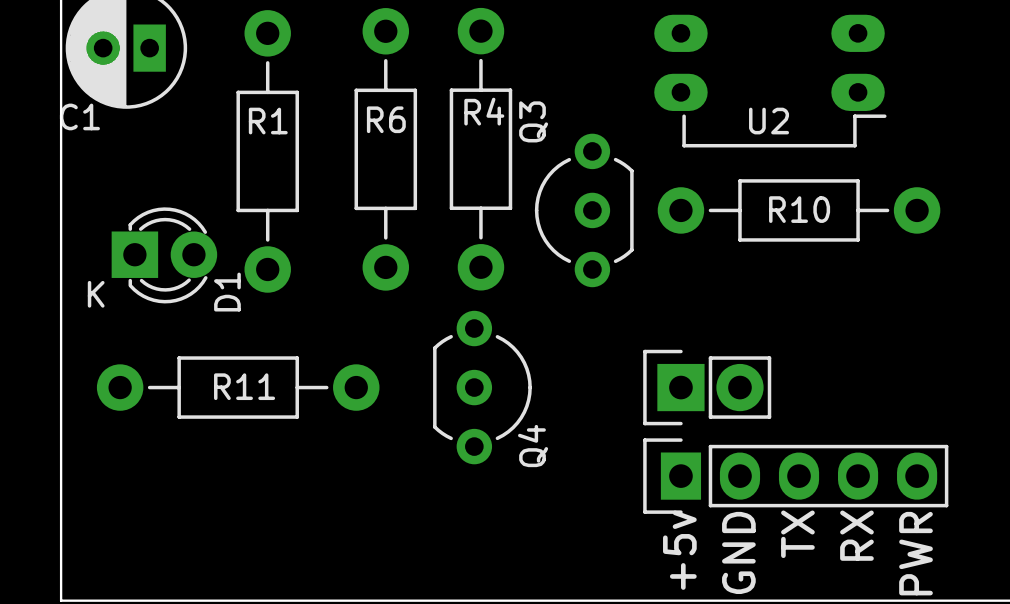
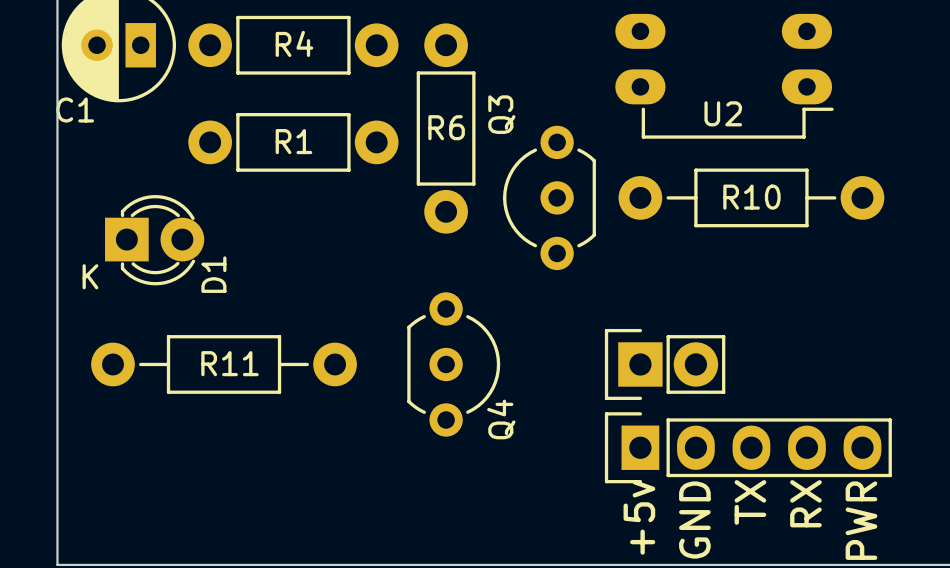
R4 footprint: [449, 7, 513, 291] -> [188, 15, 399, 75]
R6 footprint: [354, 8, 418, 291] -> [416, 23, 476, 234]
R1 footprint: [236, 10, 299, 293] -> [188, 113, 399, 172]

